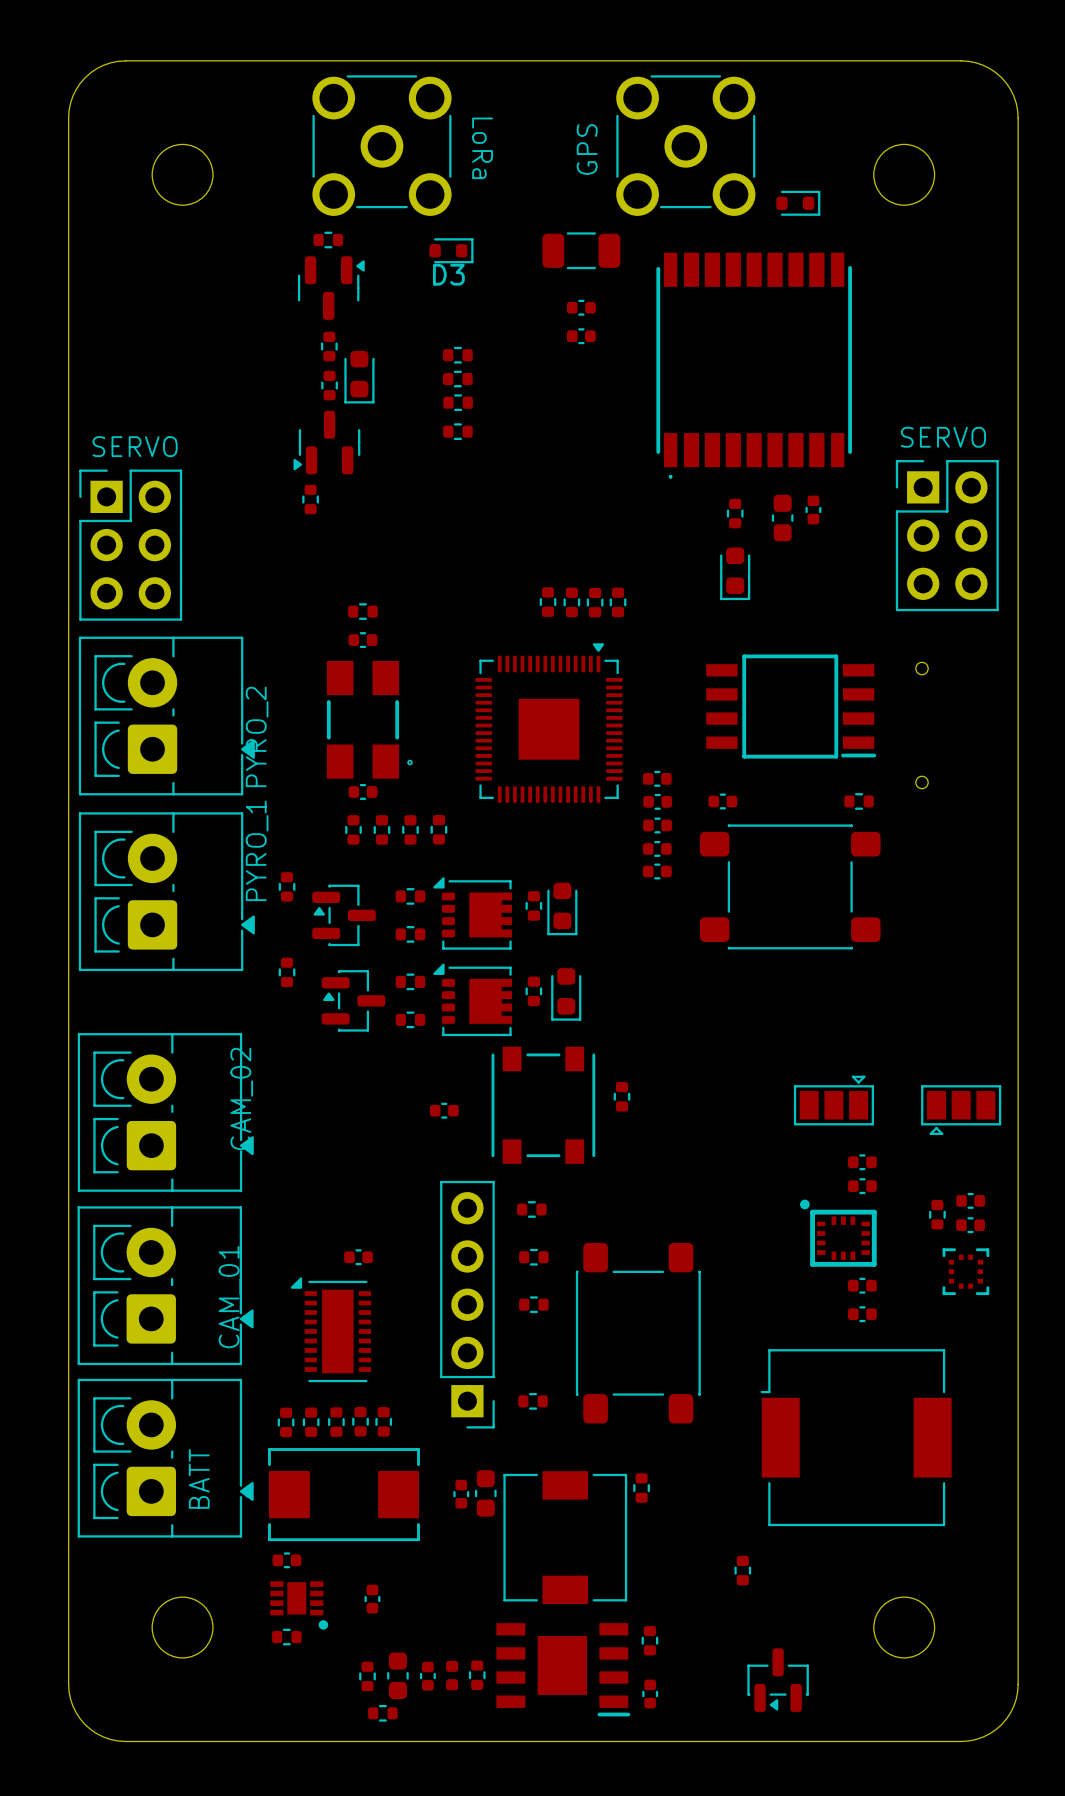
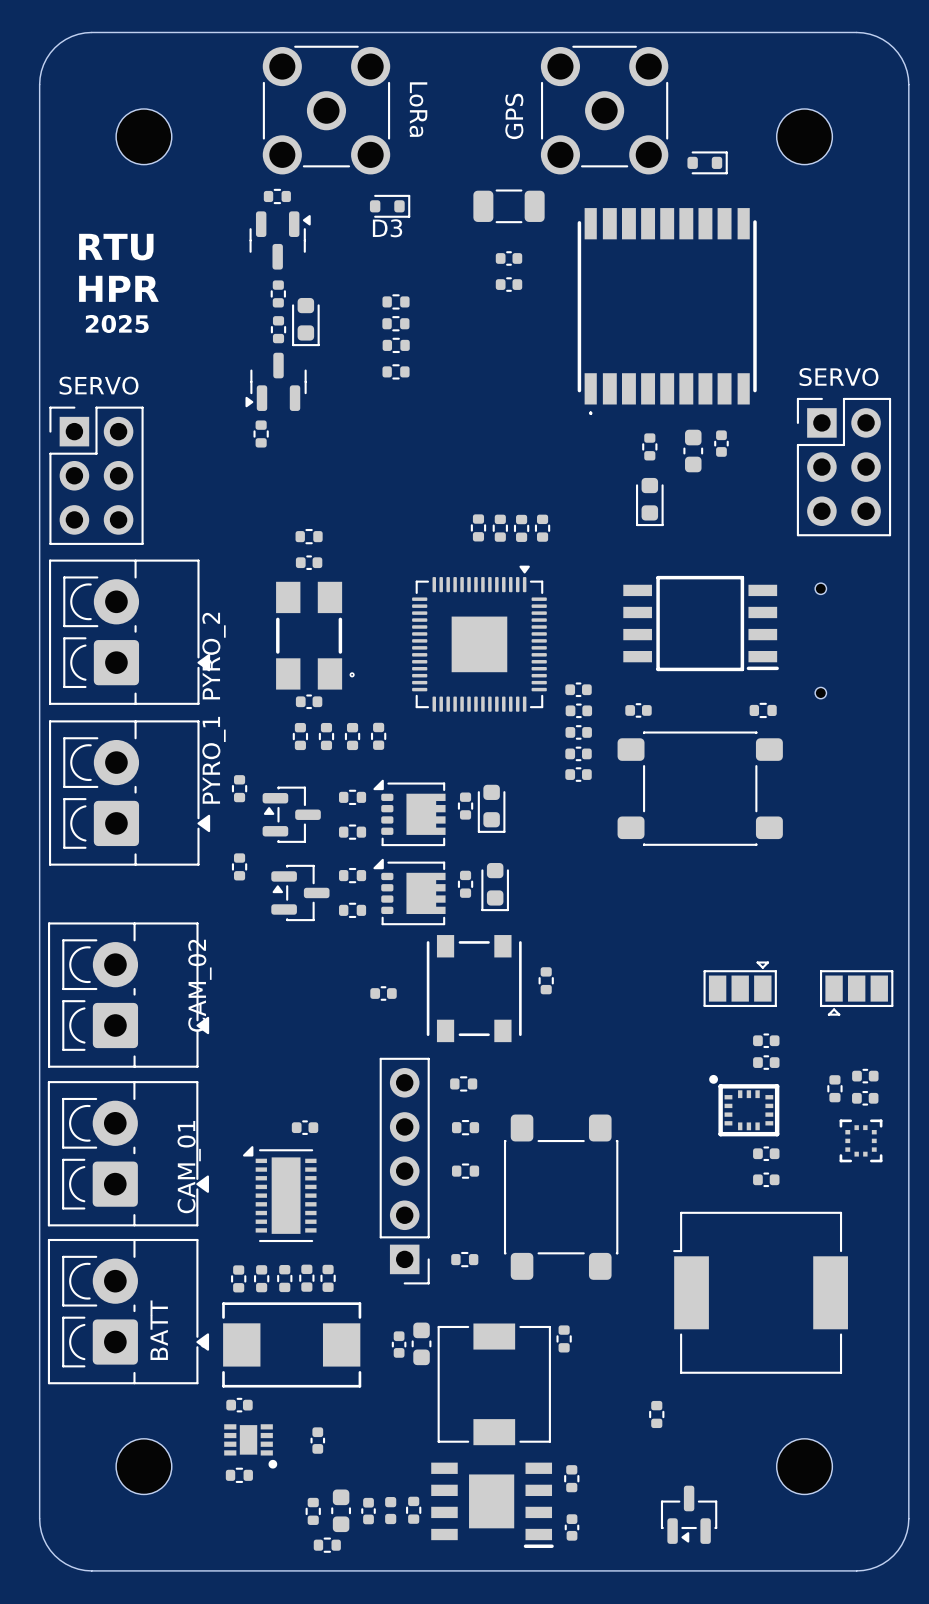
text: none -> RTU (116, 247)
text: none -> HPR (118, 288)
text: none -> 2025 (117, 323)

